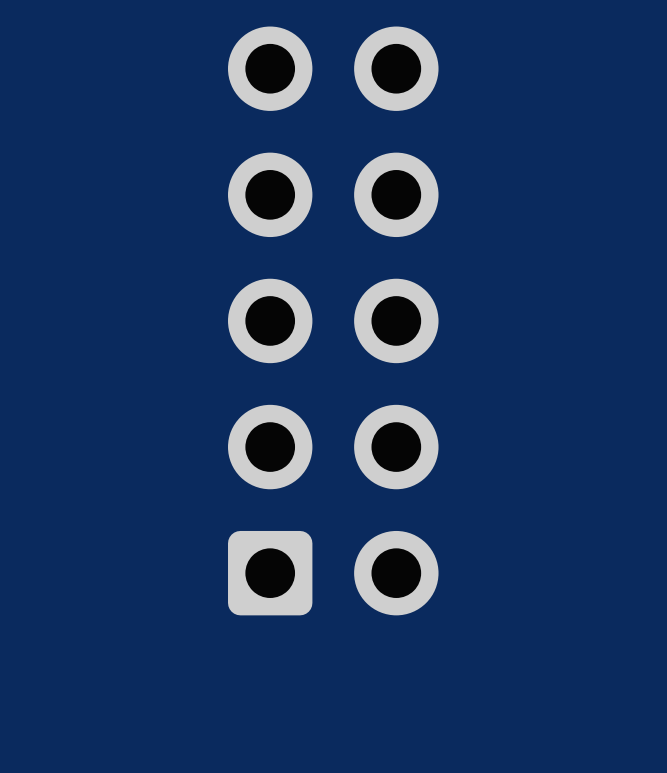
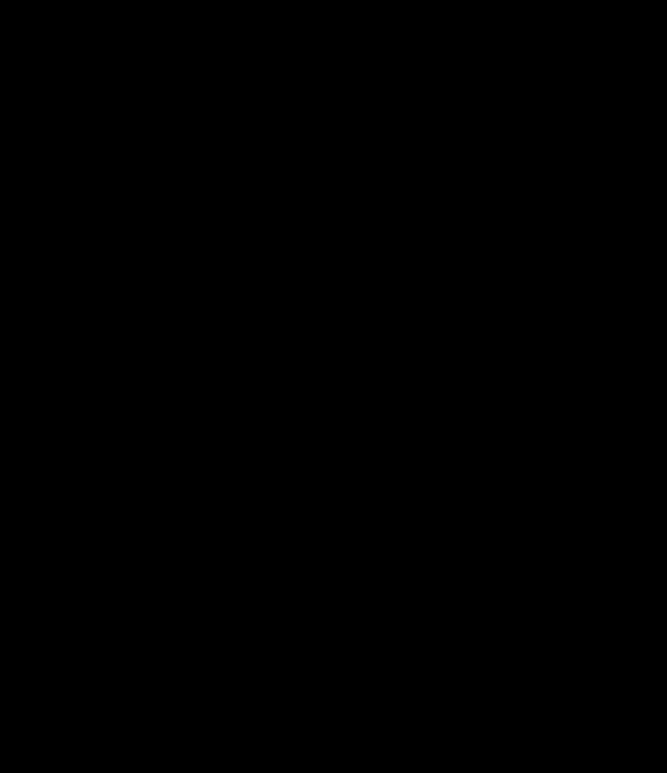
part: (333, 320) -> none

